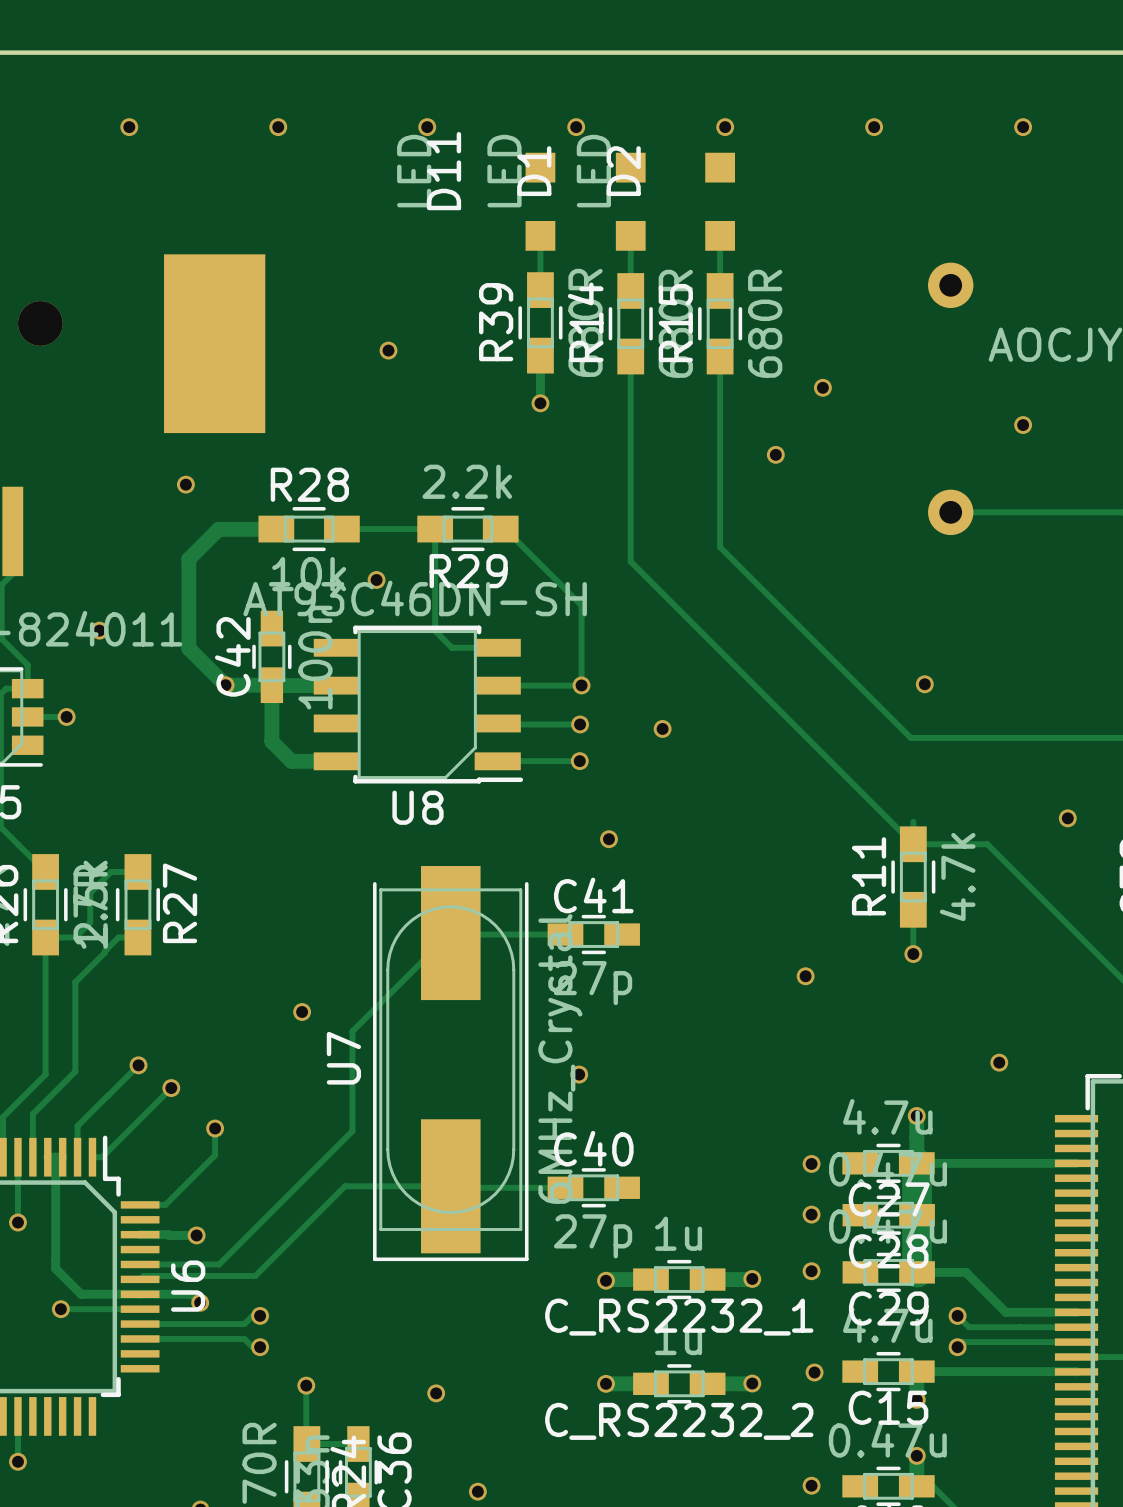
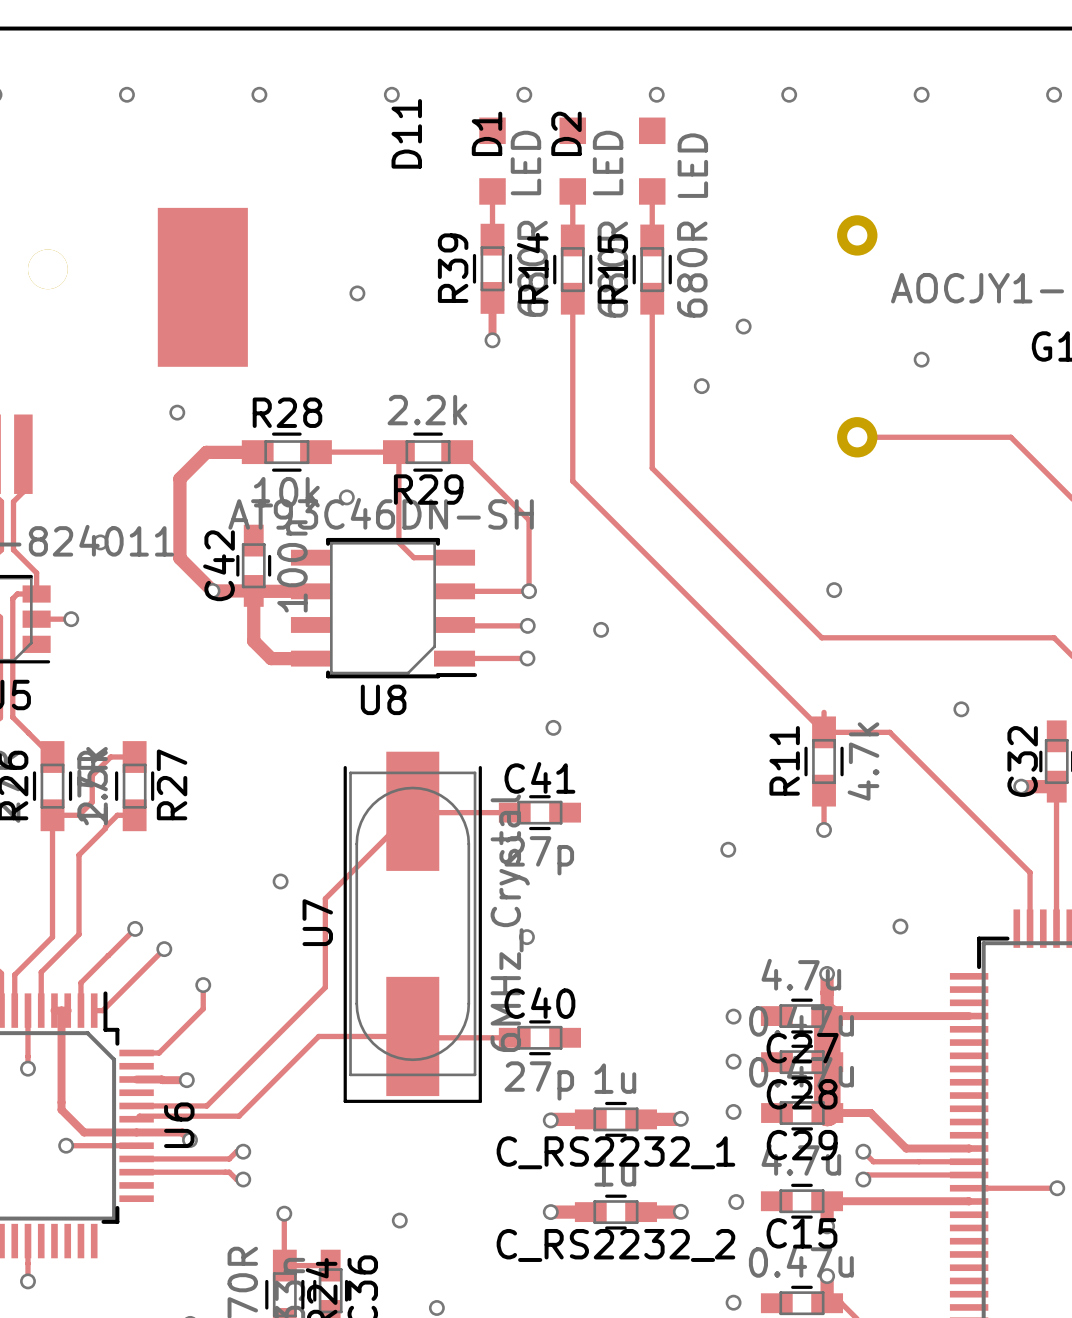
D11 value position: LED (414, 171) -> LED (525, 163)
D1 value position: LED (504, 171) -> LED (608, 163)
D2 value position: LED (593, 171) -> LED (692, 165)

